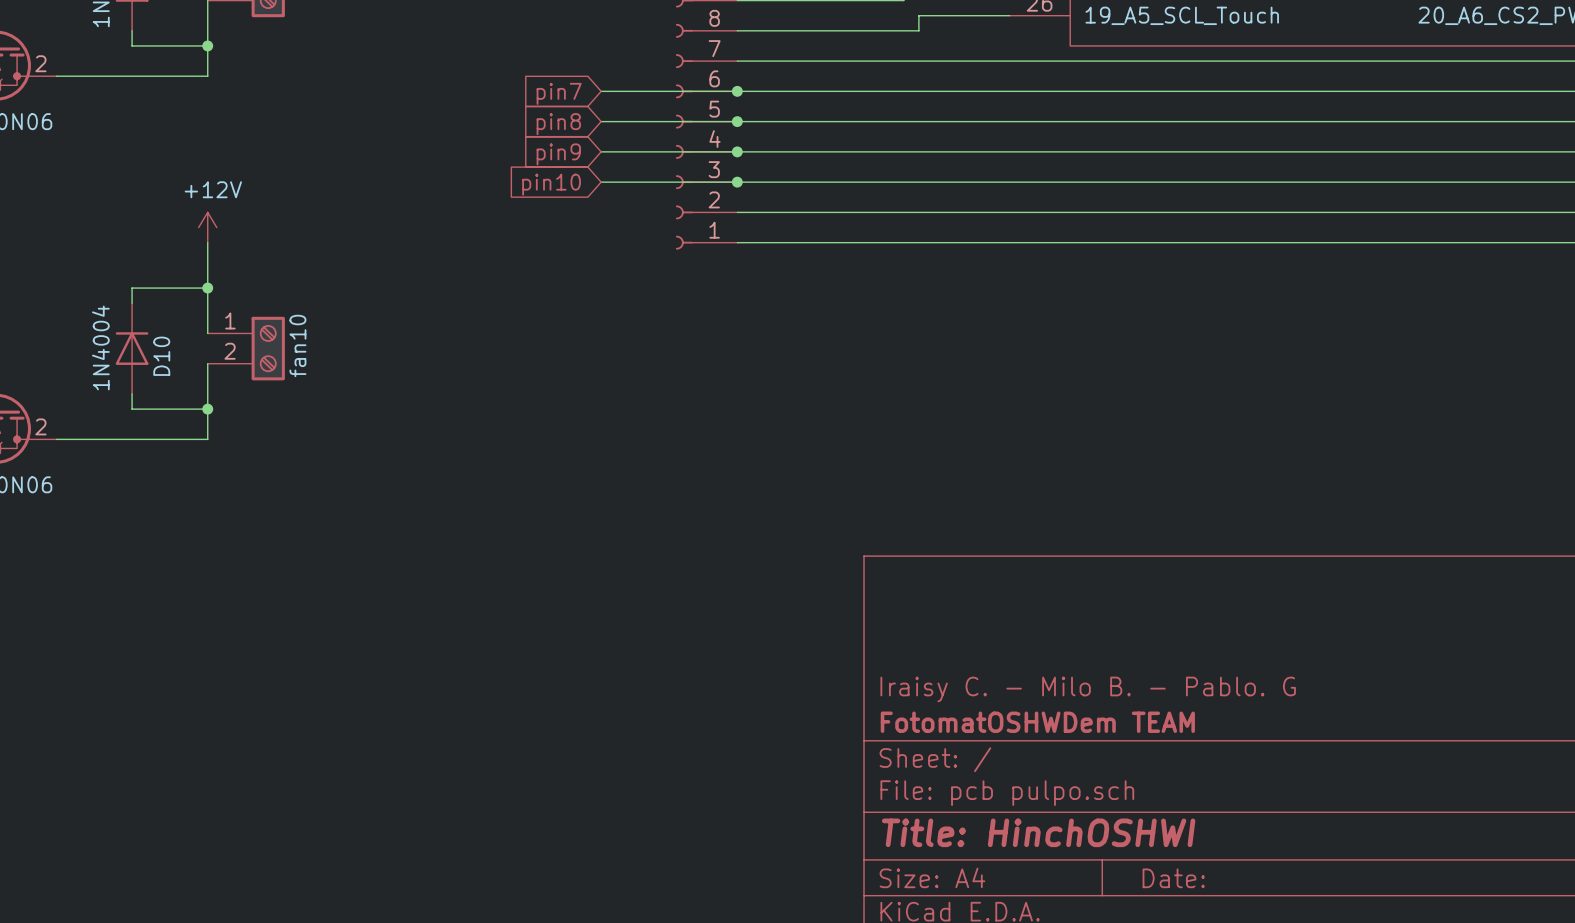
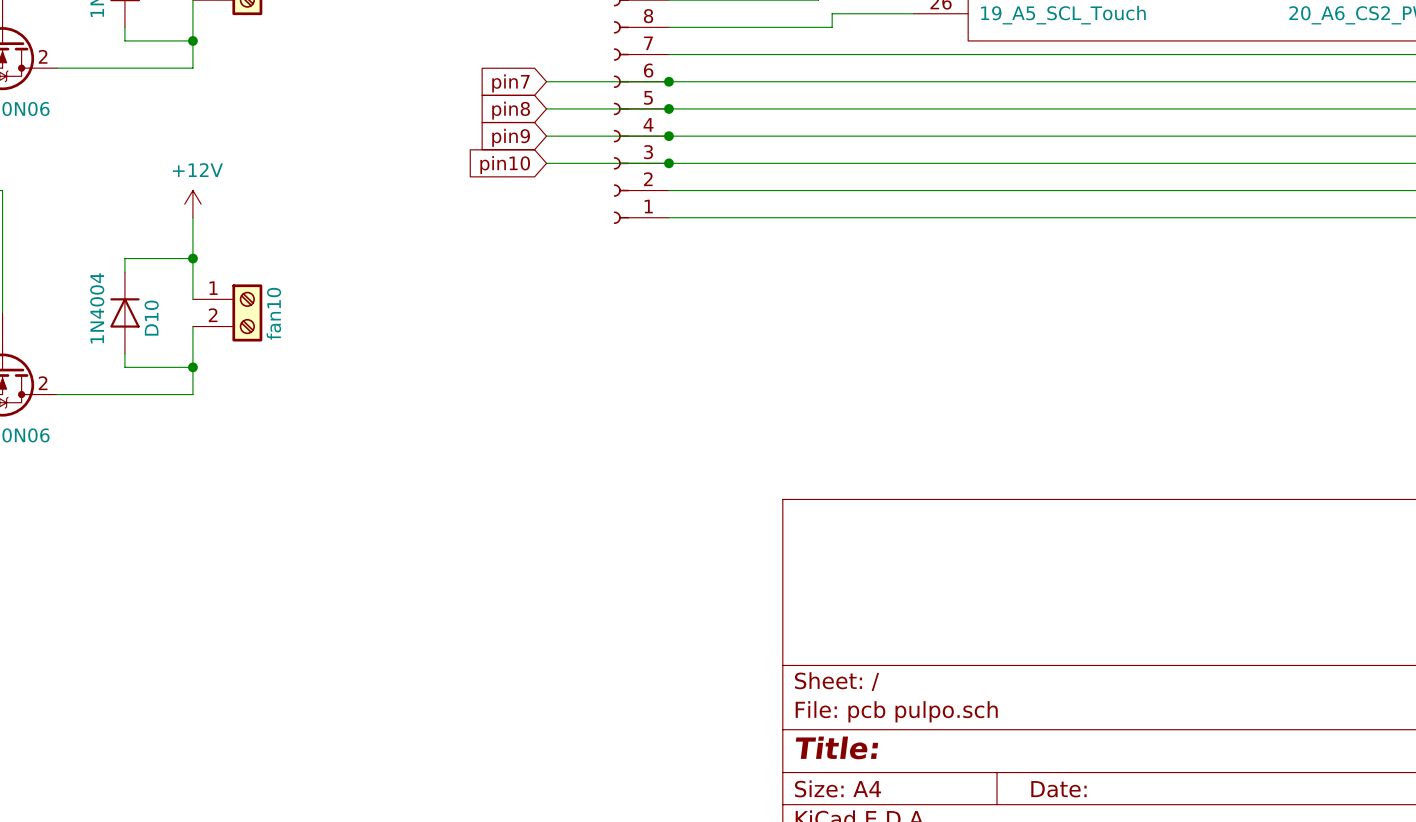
title block: Iraisy C. - Milo B. - Pablo. G (1088, 689) -> none
title block: FotomatOSHWDem TEAM (1037, 722) -> none
title block: Title: HinchOSHWI (1038, 832) -> Title: (836, 747)

